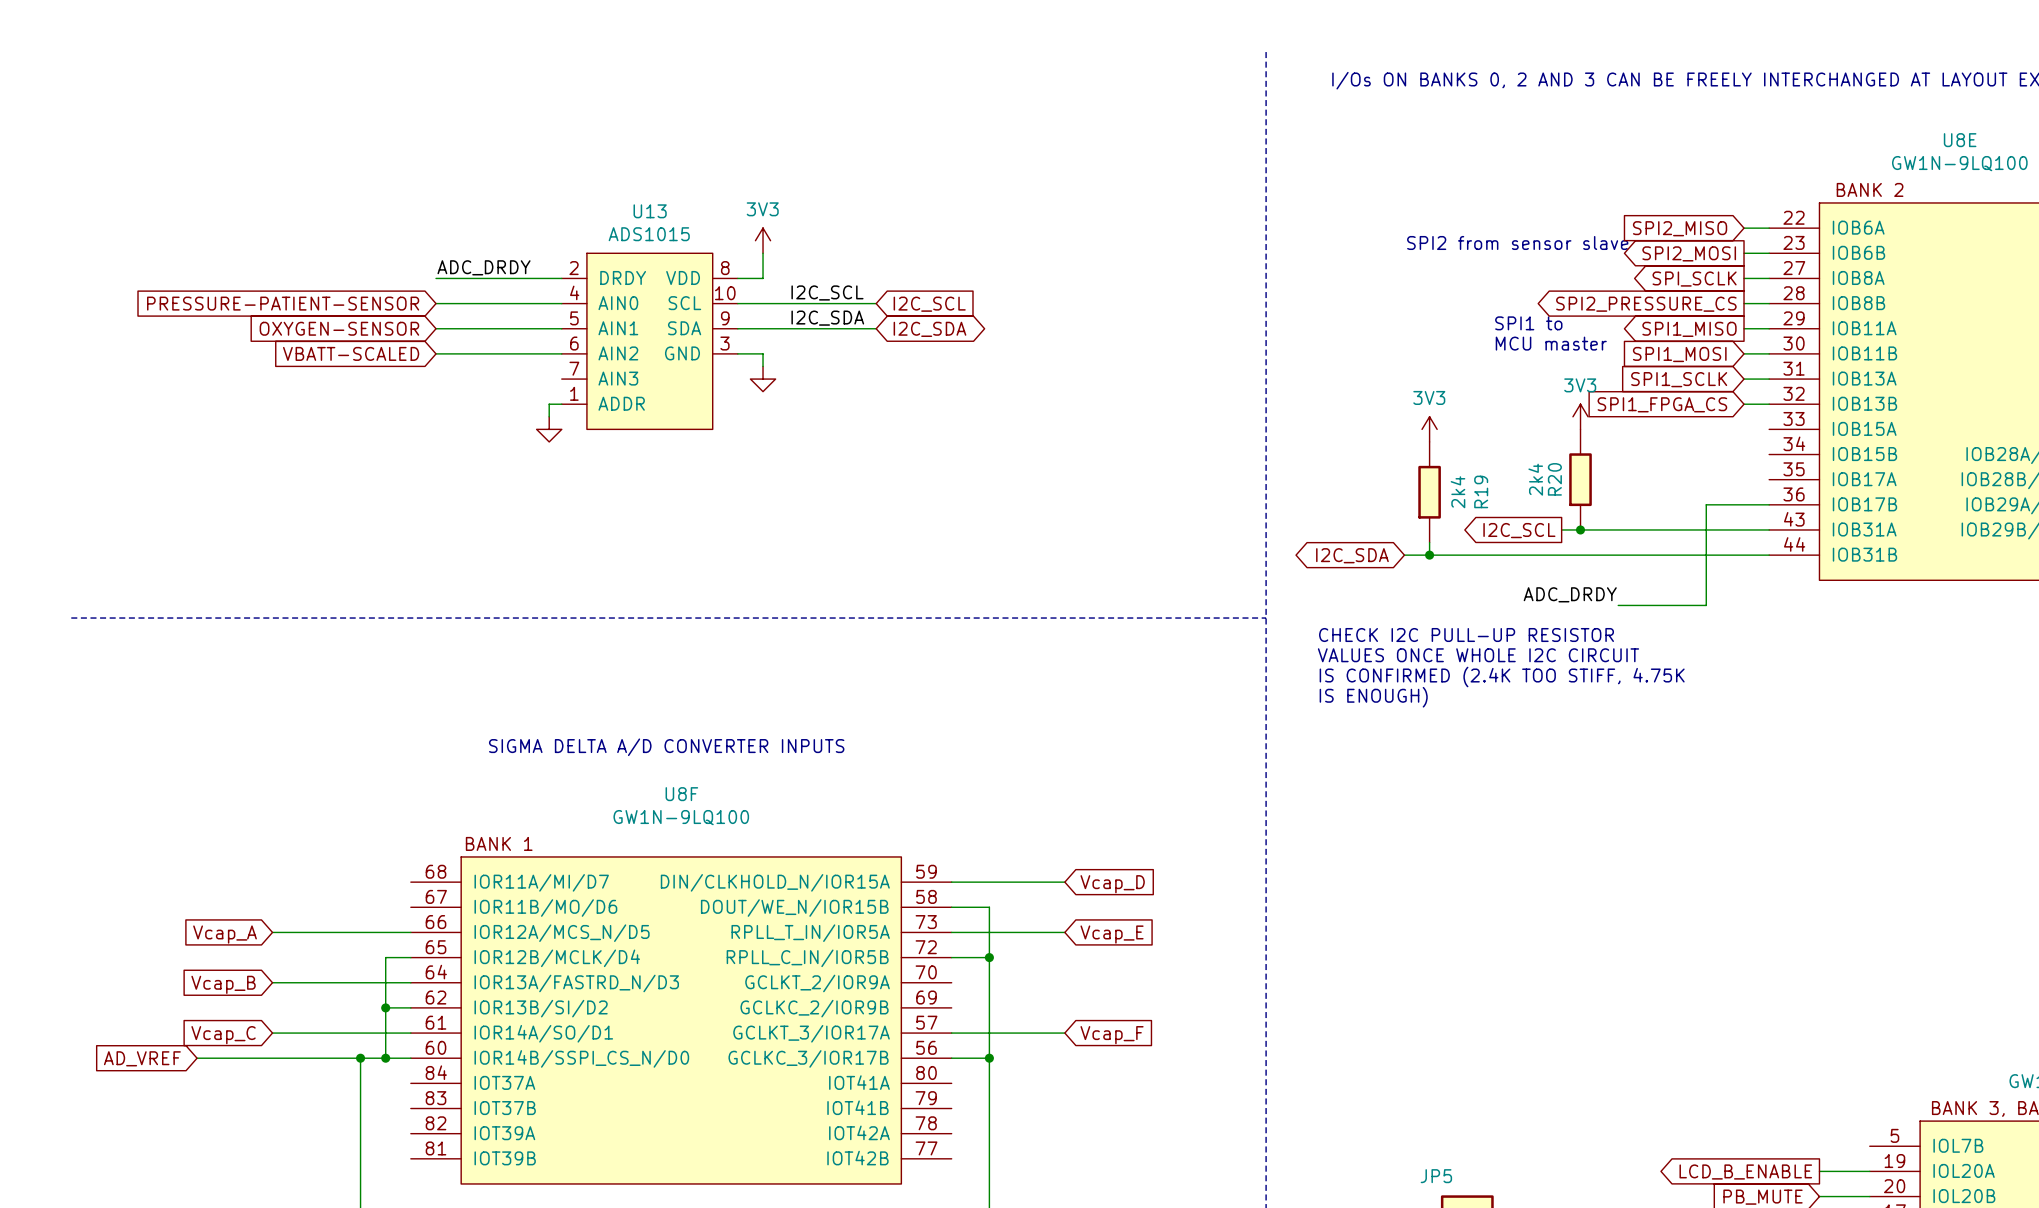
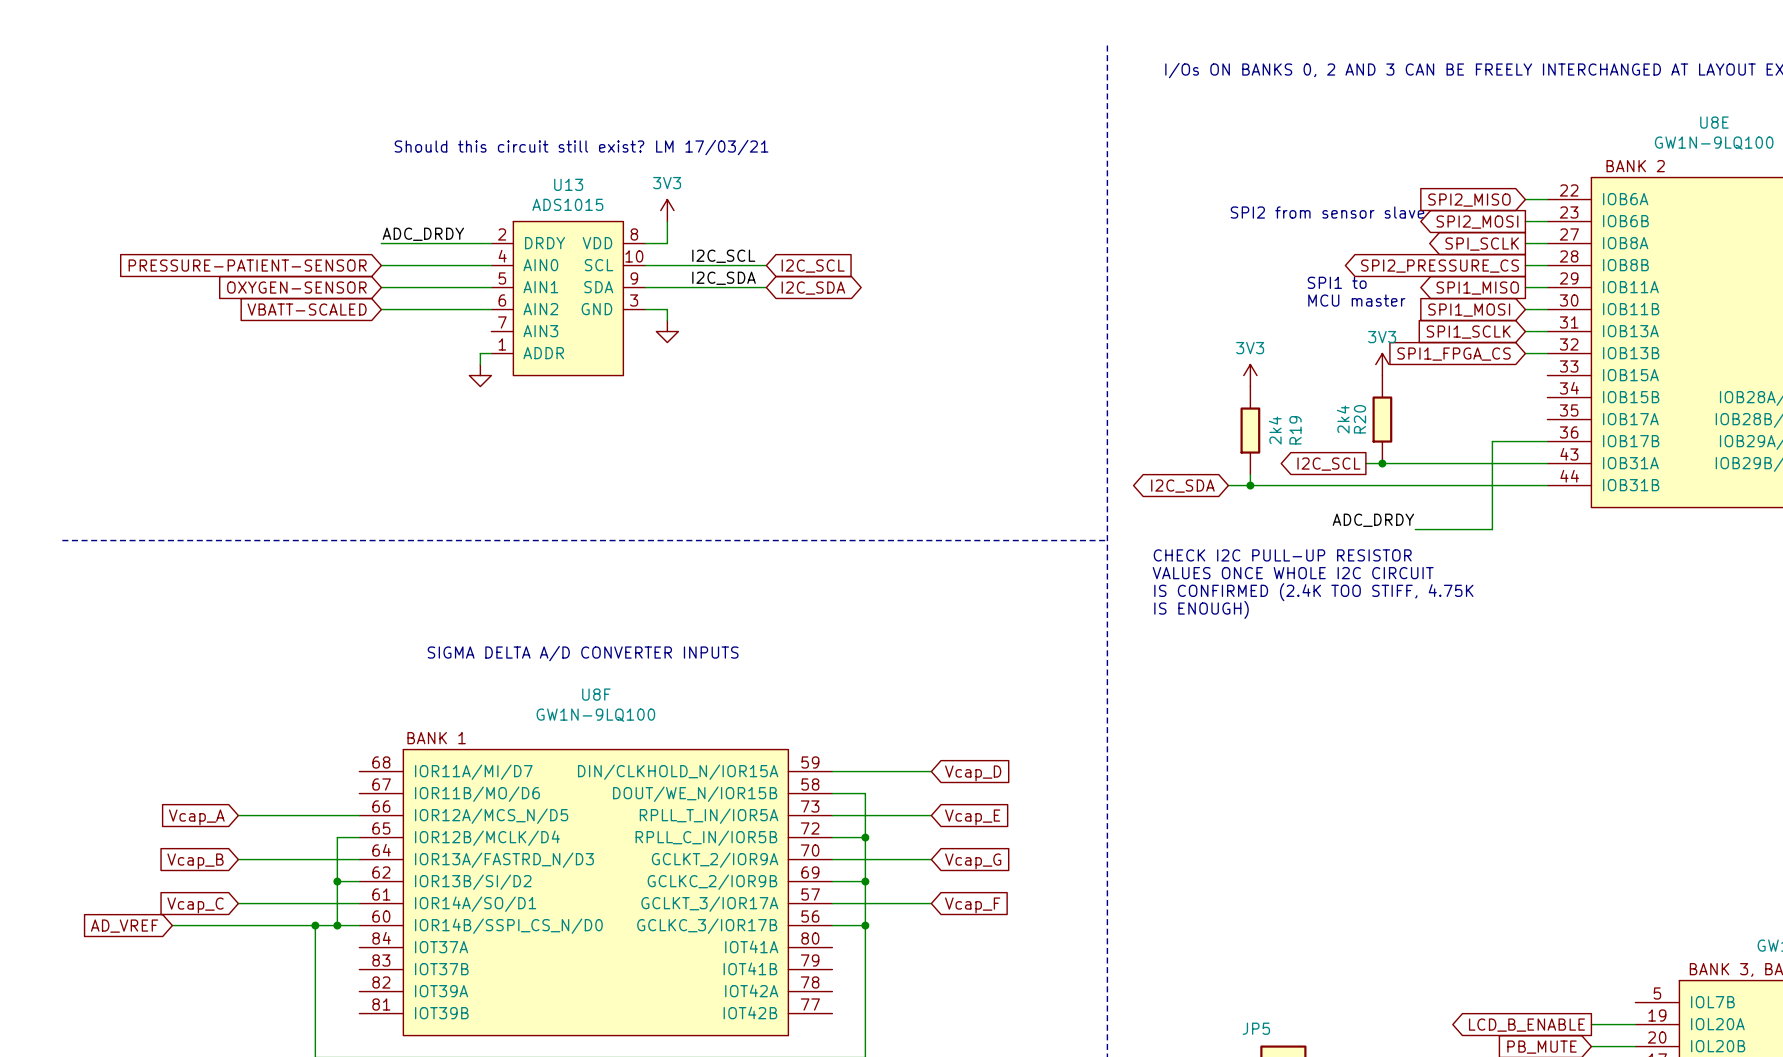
text: none -> Should this circuit still exist? LM 17/03/21 (581, 147)
wire: none -> (832, 859) (931, 859)
global label: none -> Vcap_G (973, 861)
wire: none -> (832, 881) (865, 881)
junction: none -> (865, 881)

